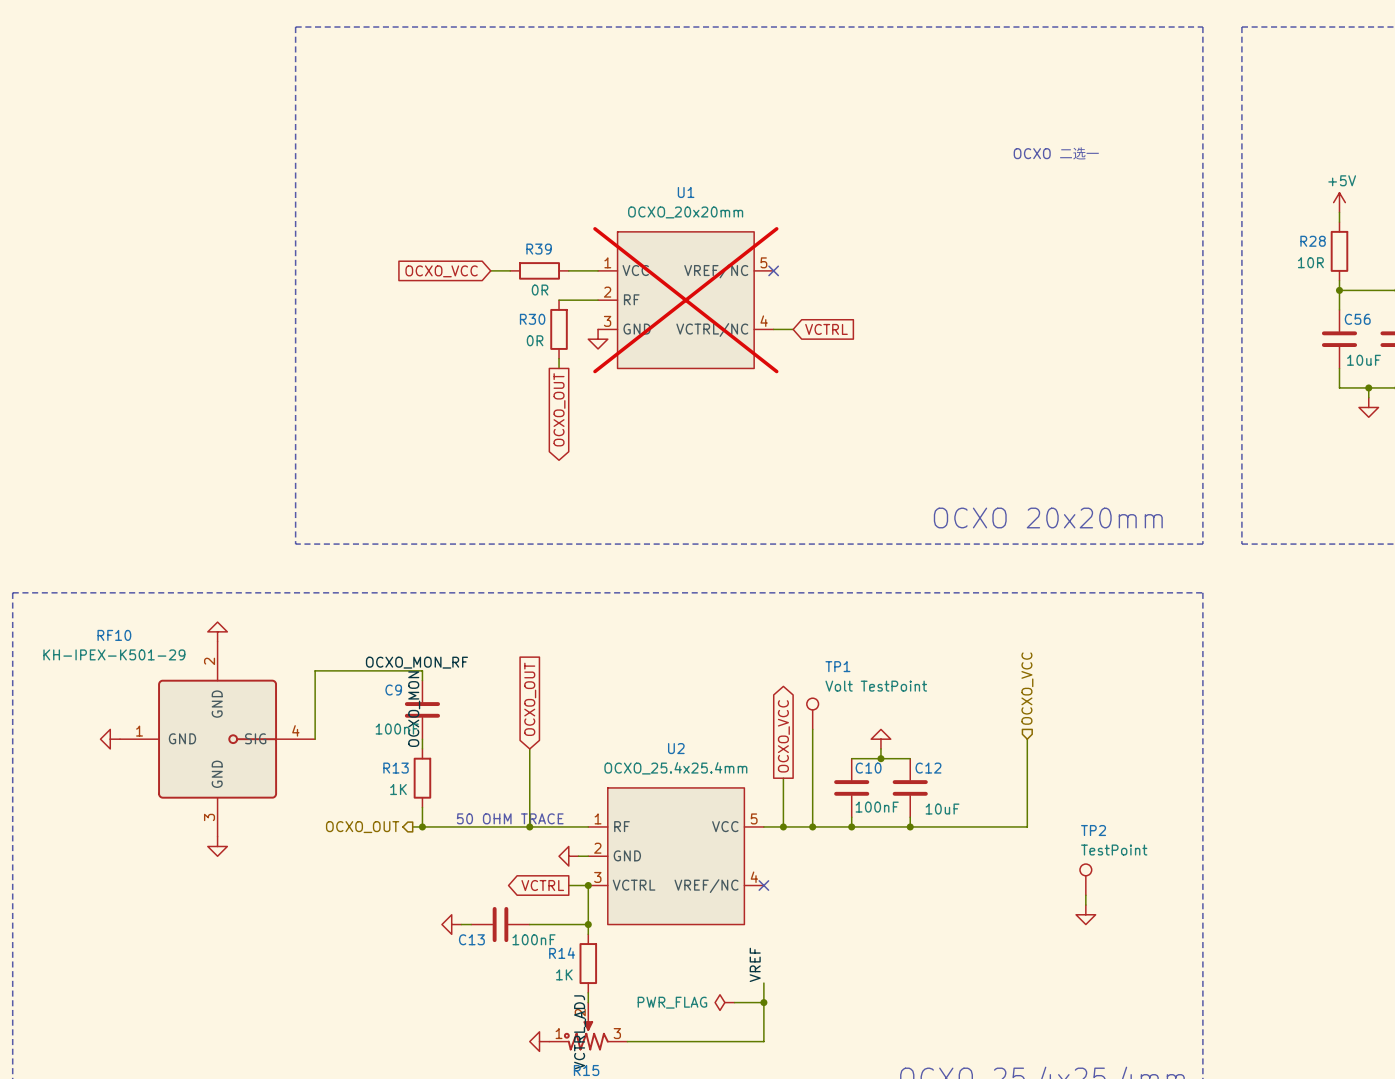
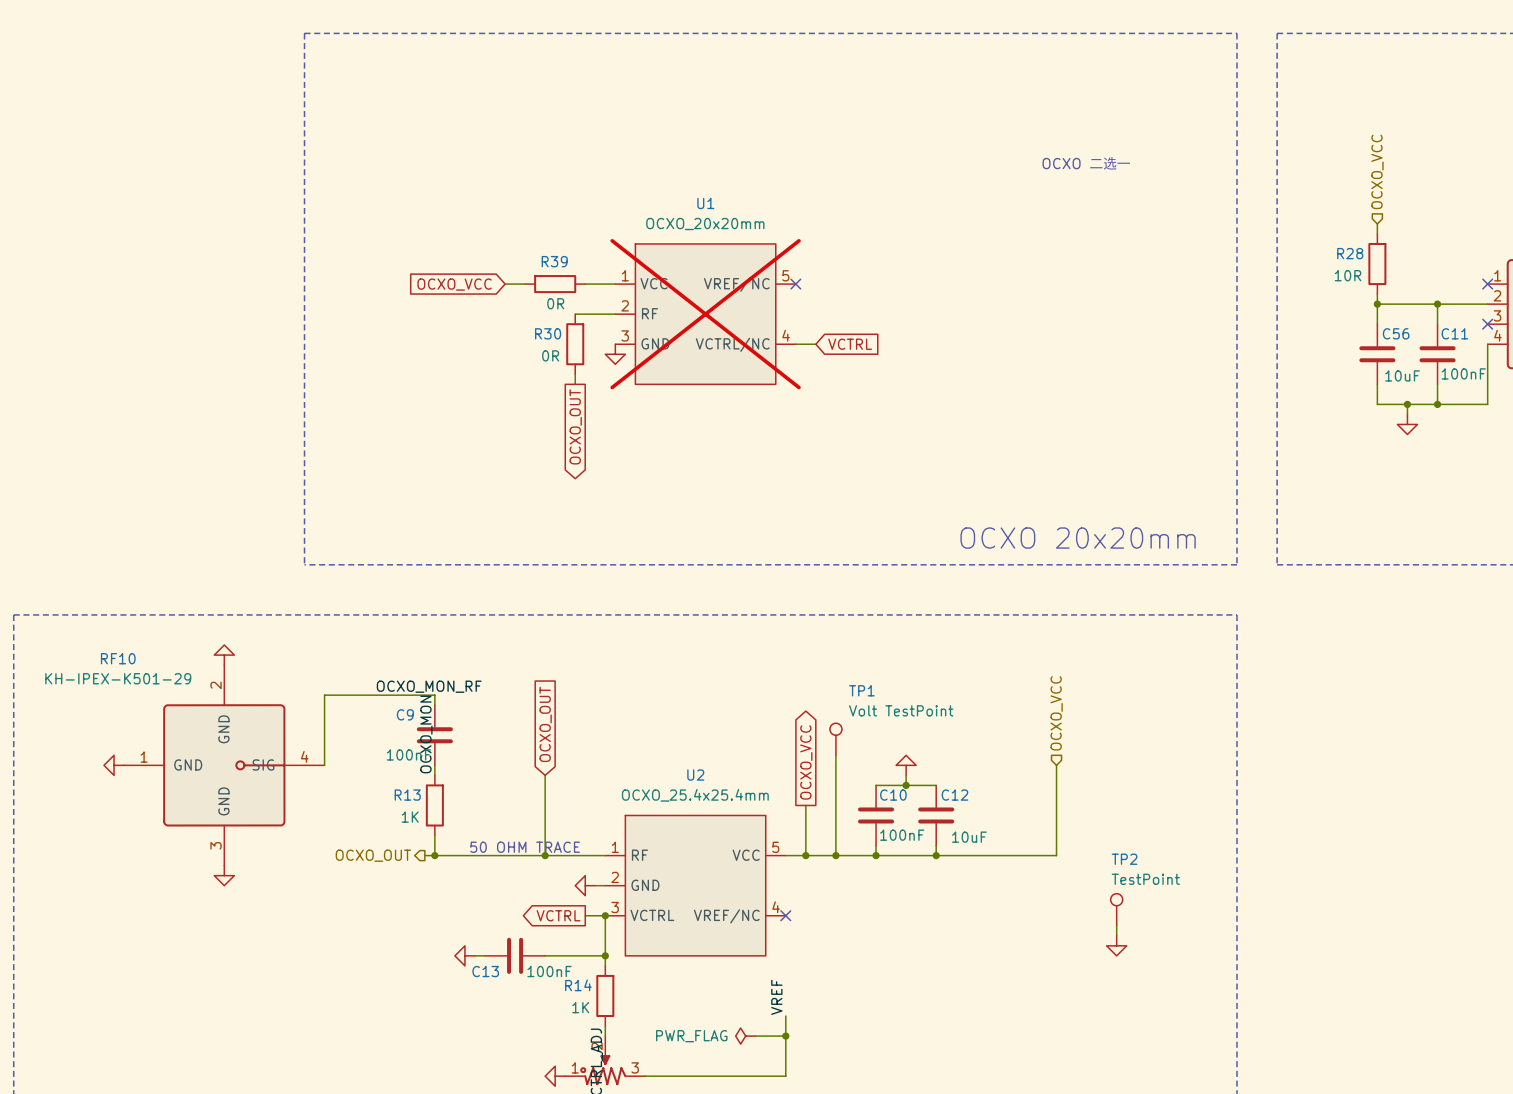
hierarchical label: none -> OCXO_VCC (1377, 171)
power symbol: +5V (1339, 202) -> none

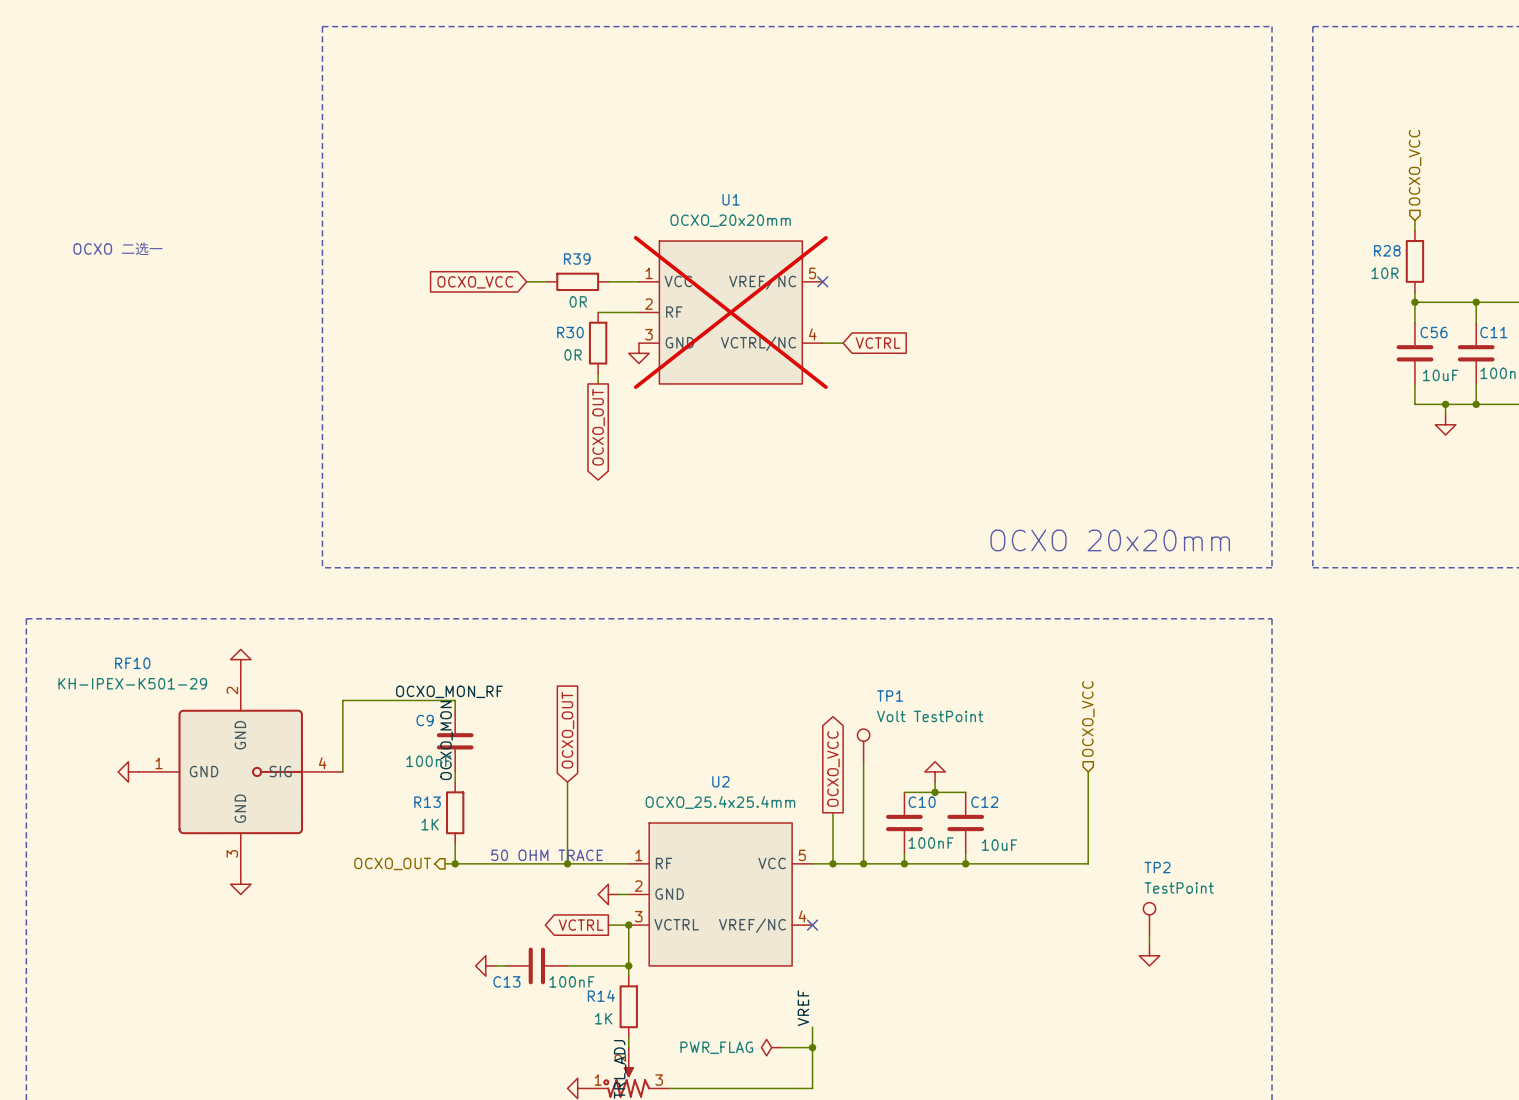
text: OCXO 二选一 (1086, 163) -> none
text: none -> OCXO 二选一 (118, 248)

